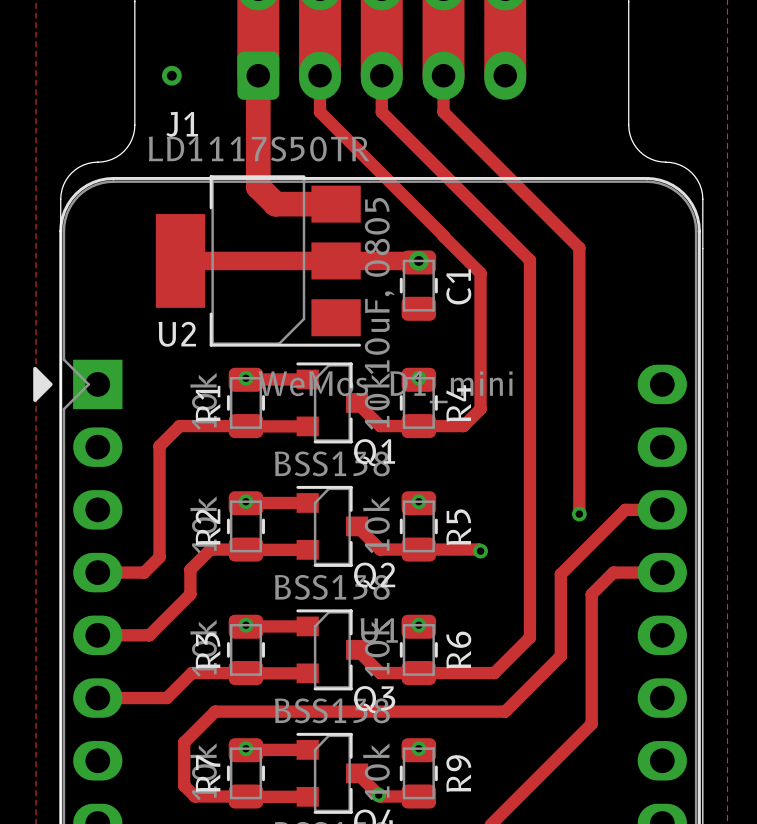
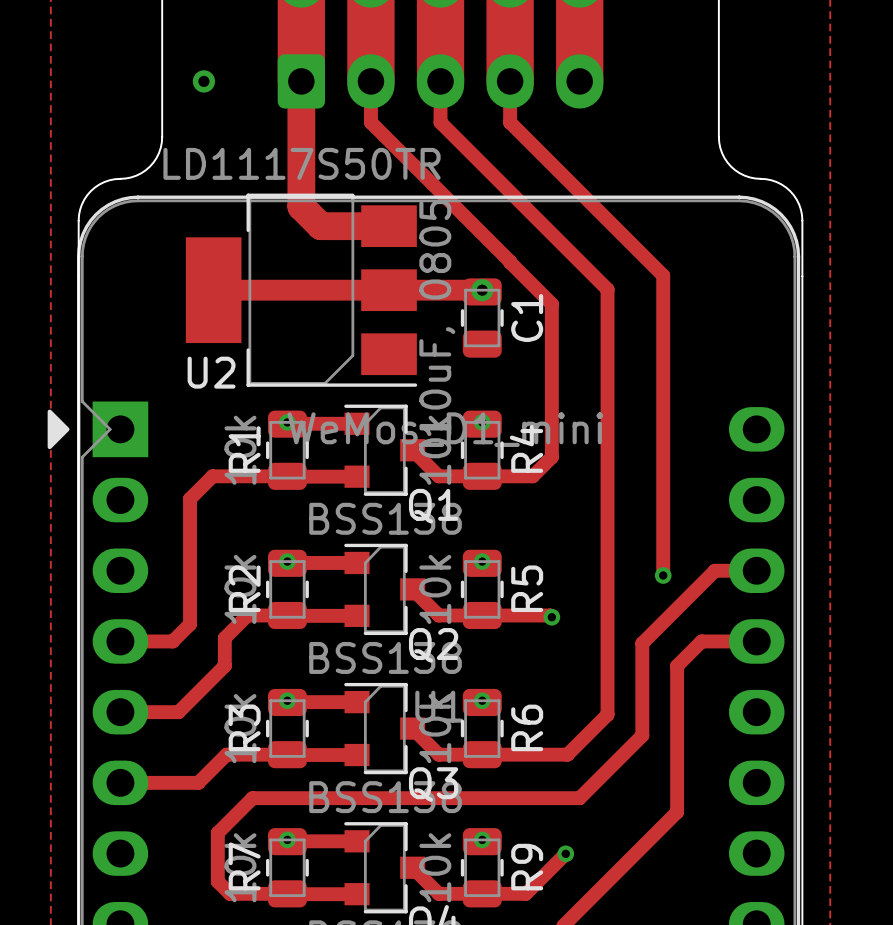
J1 name: J1 (182, 124) -> none
track: none -> (565, 853) (525, 893) (482, 893)
via: none -> (565, 853)
via: (378, 794) -> none

